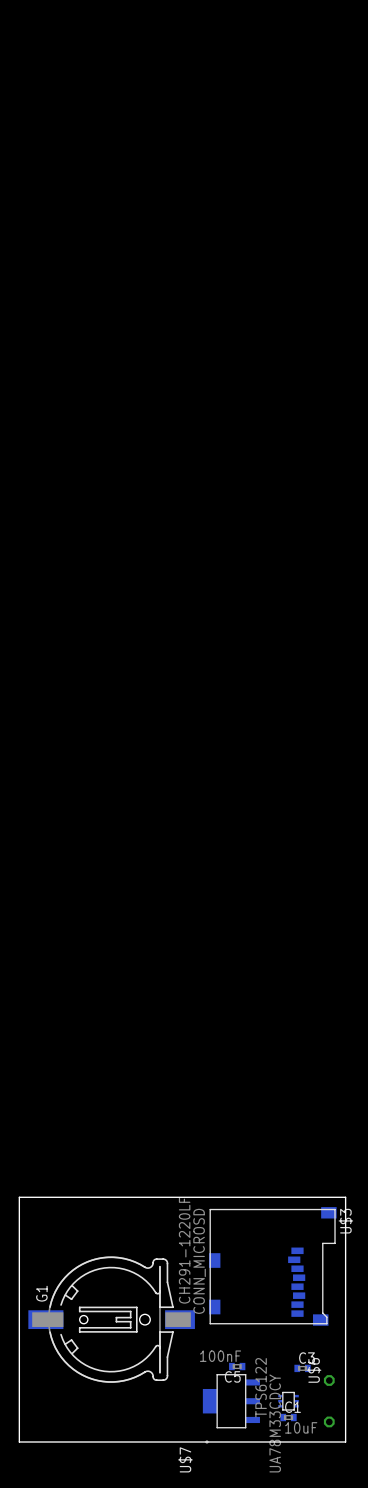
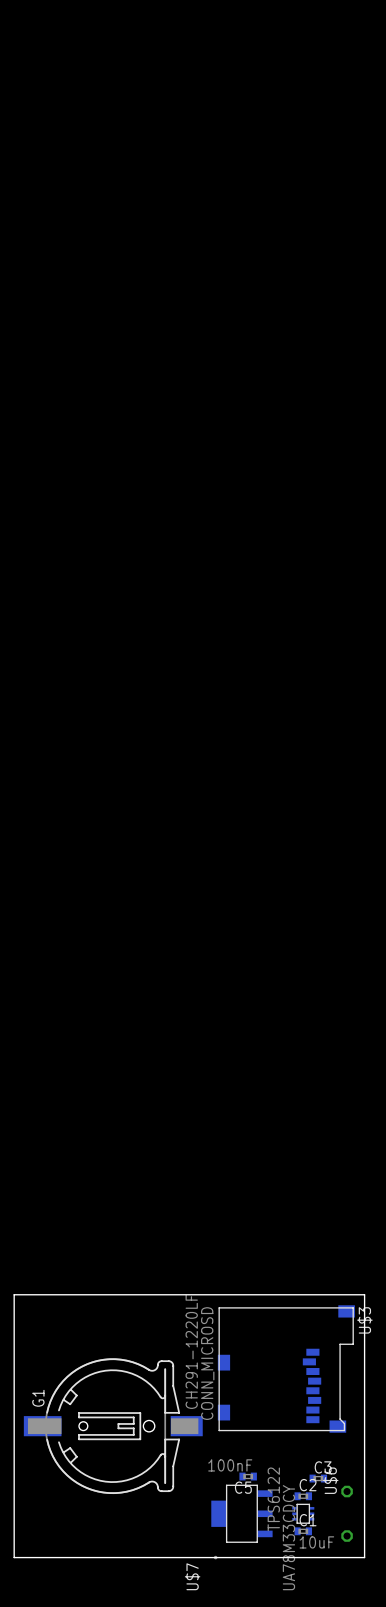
C2: none -> (303, 1496)

